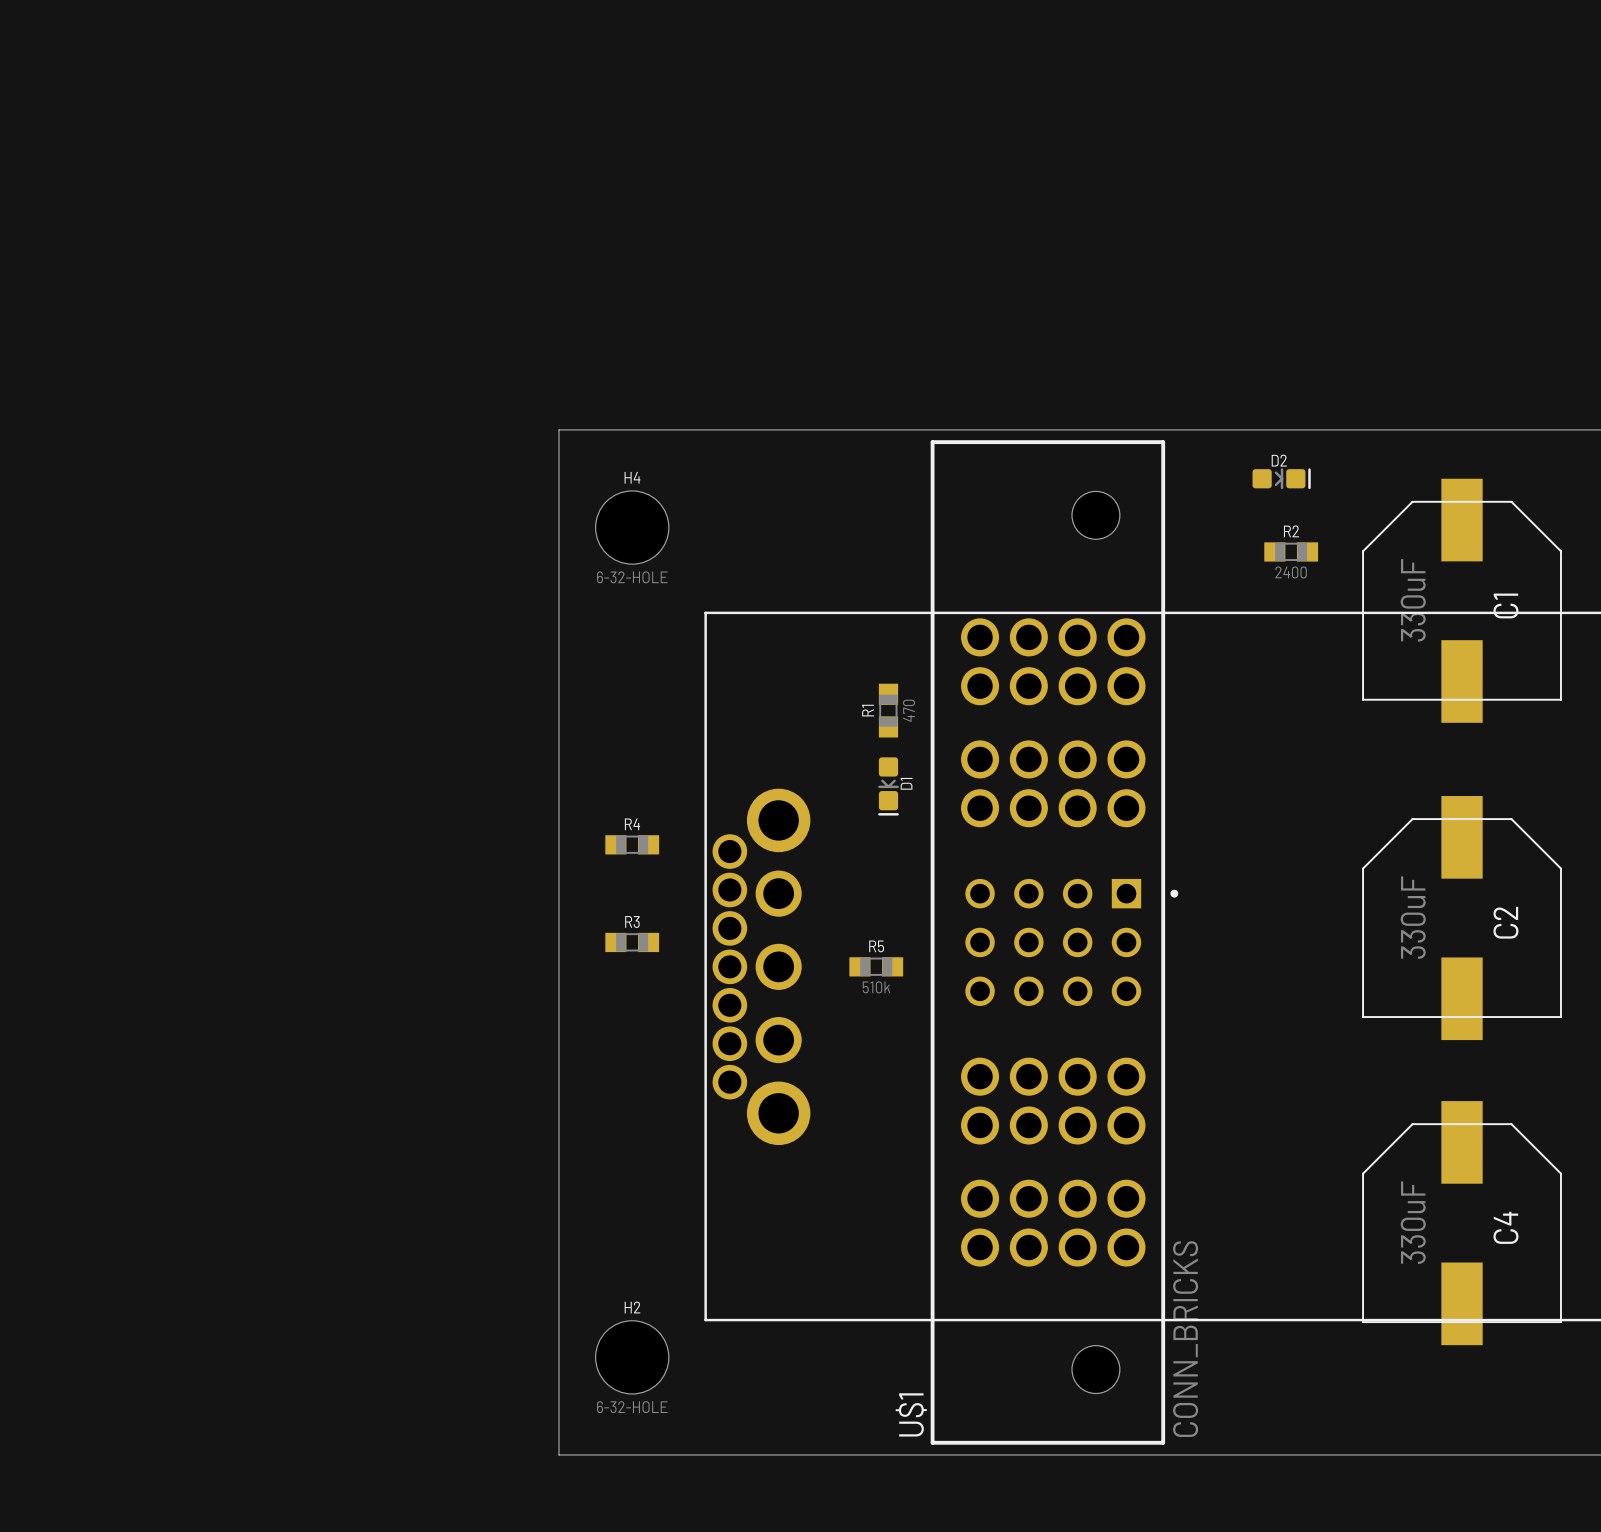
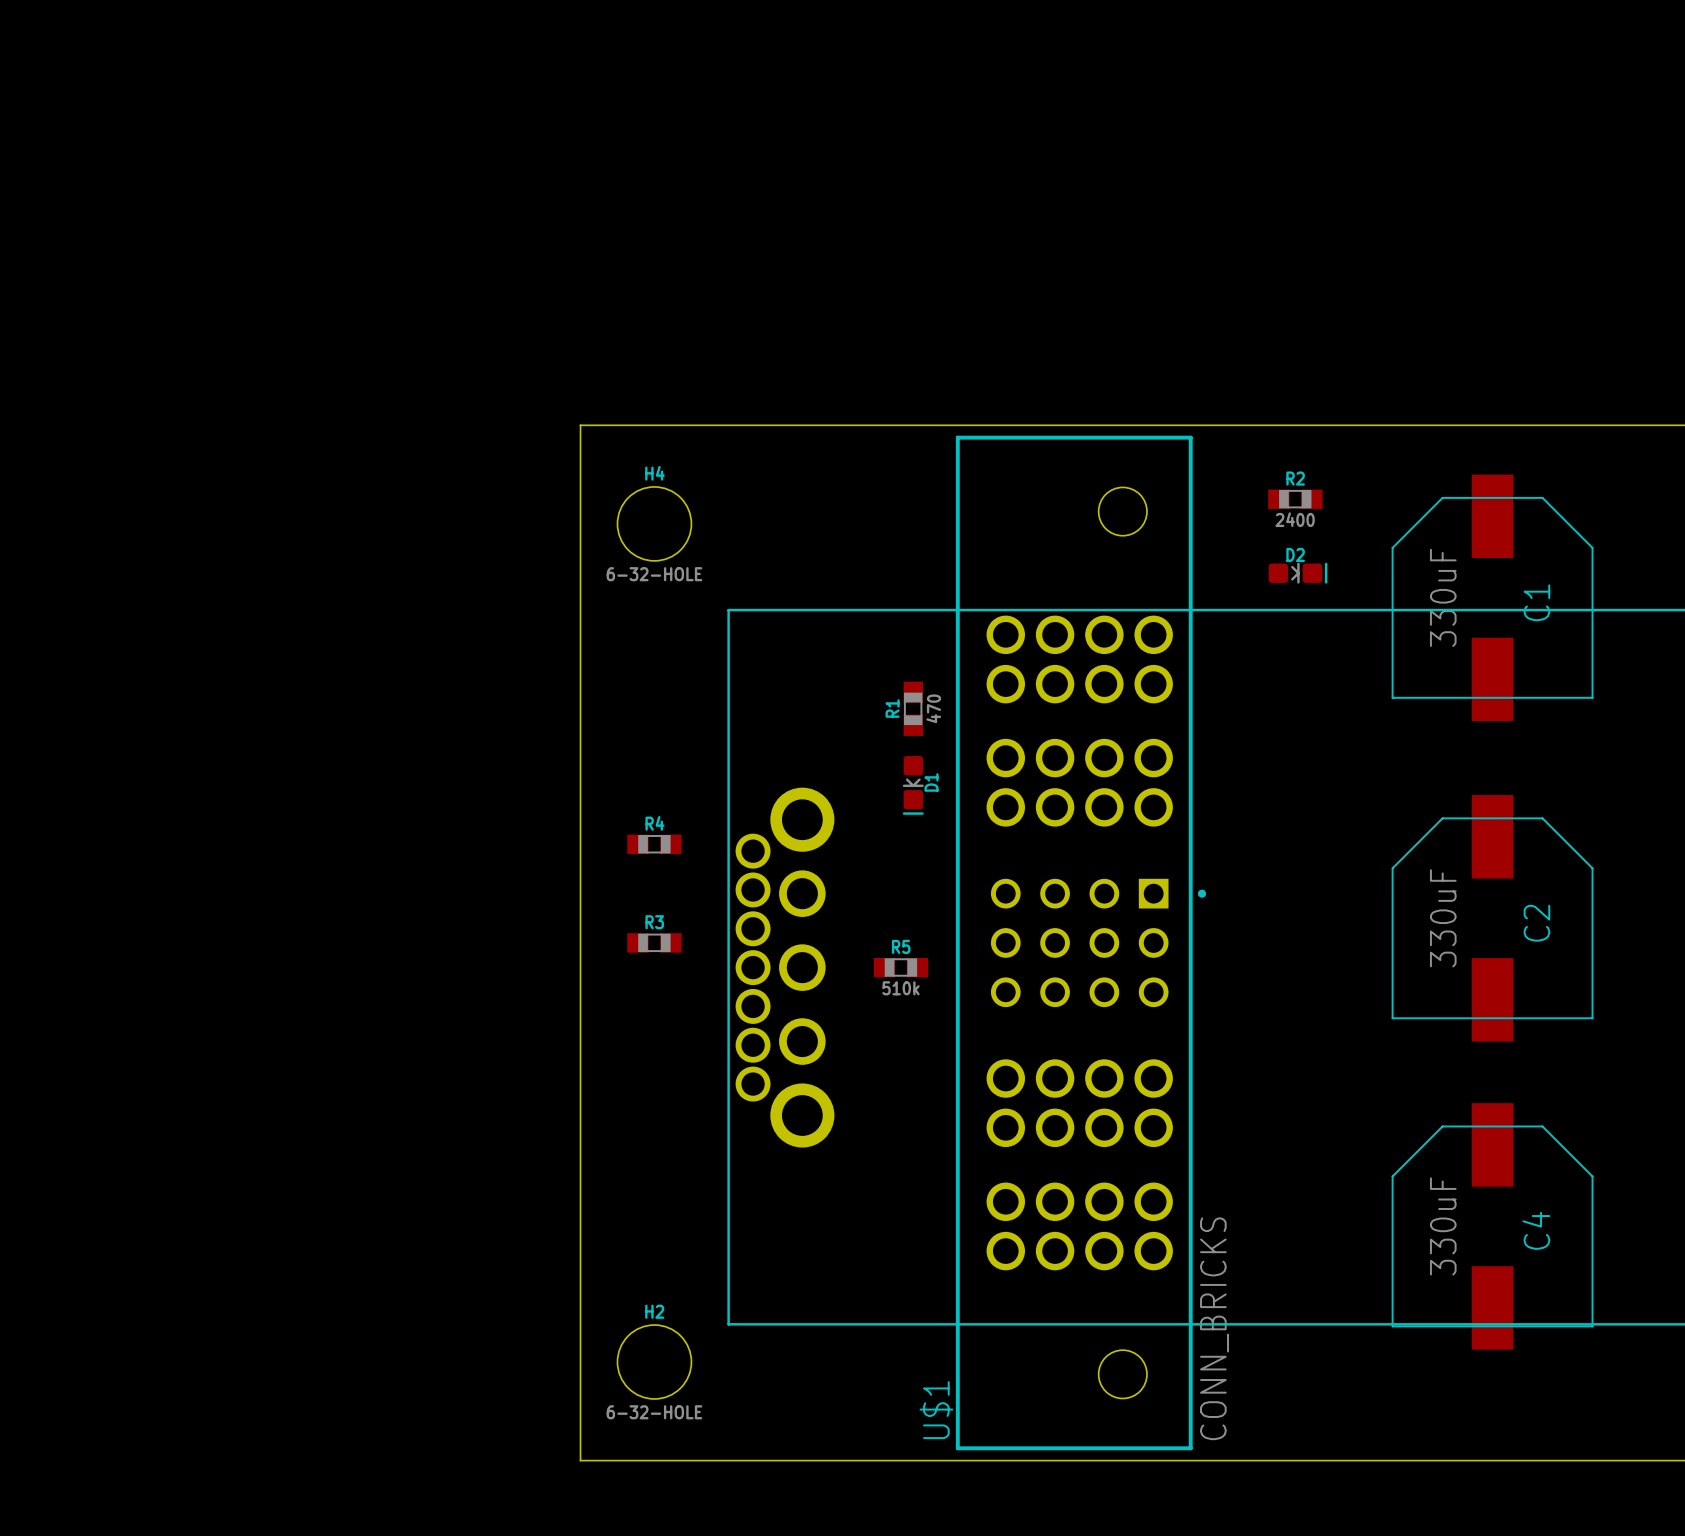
D2 position: (1281, 478) -> (1298, 573)
R2 position: (1291, 551) -> (1295, 499)

